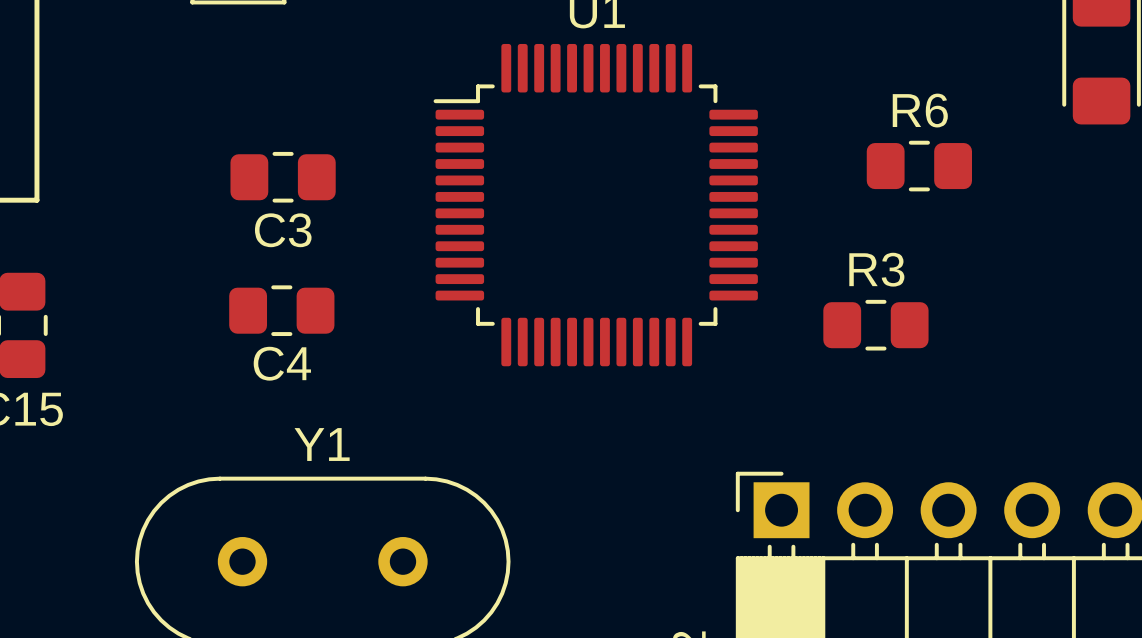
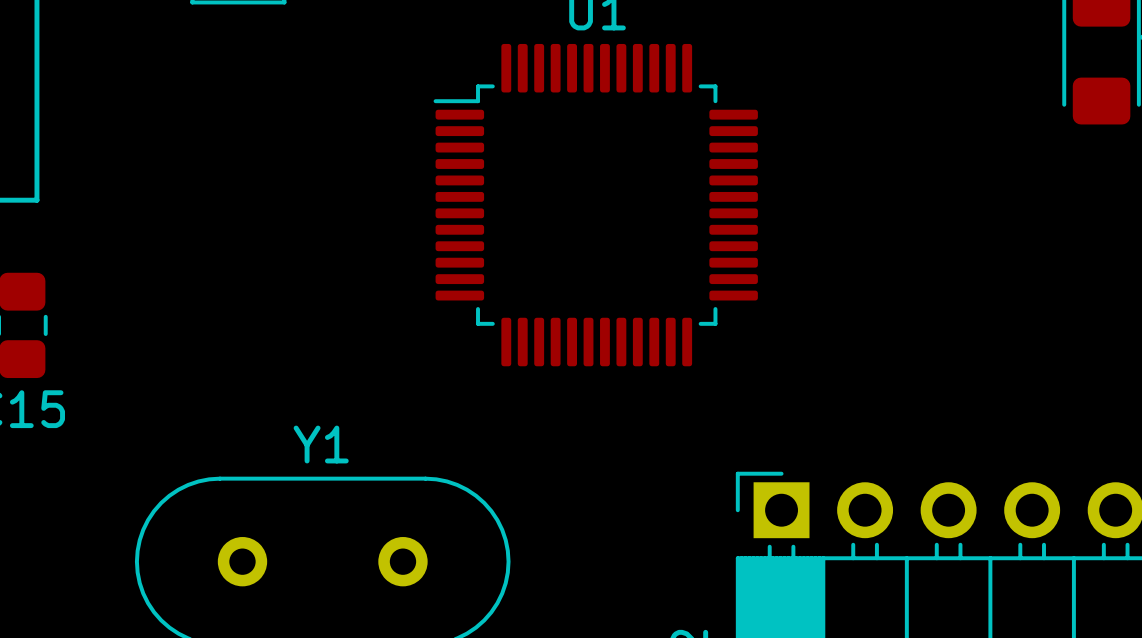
R6: (919, 166) -> none
C3: (283, 177) -> none
C4: (281, 310) -> none
R3: (875, 325) -> none

